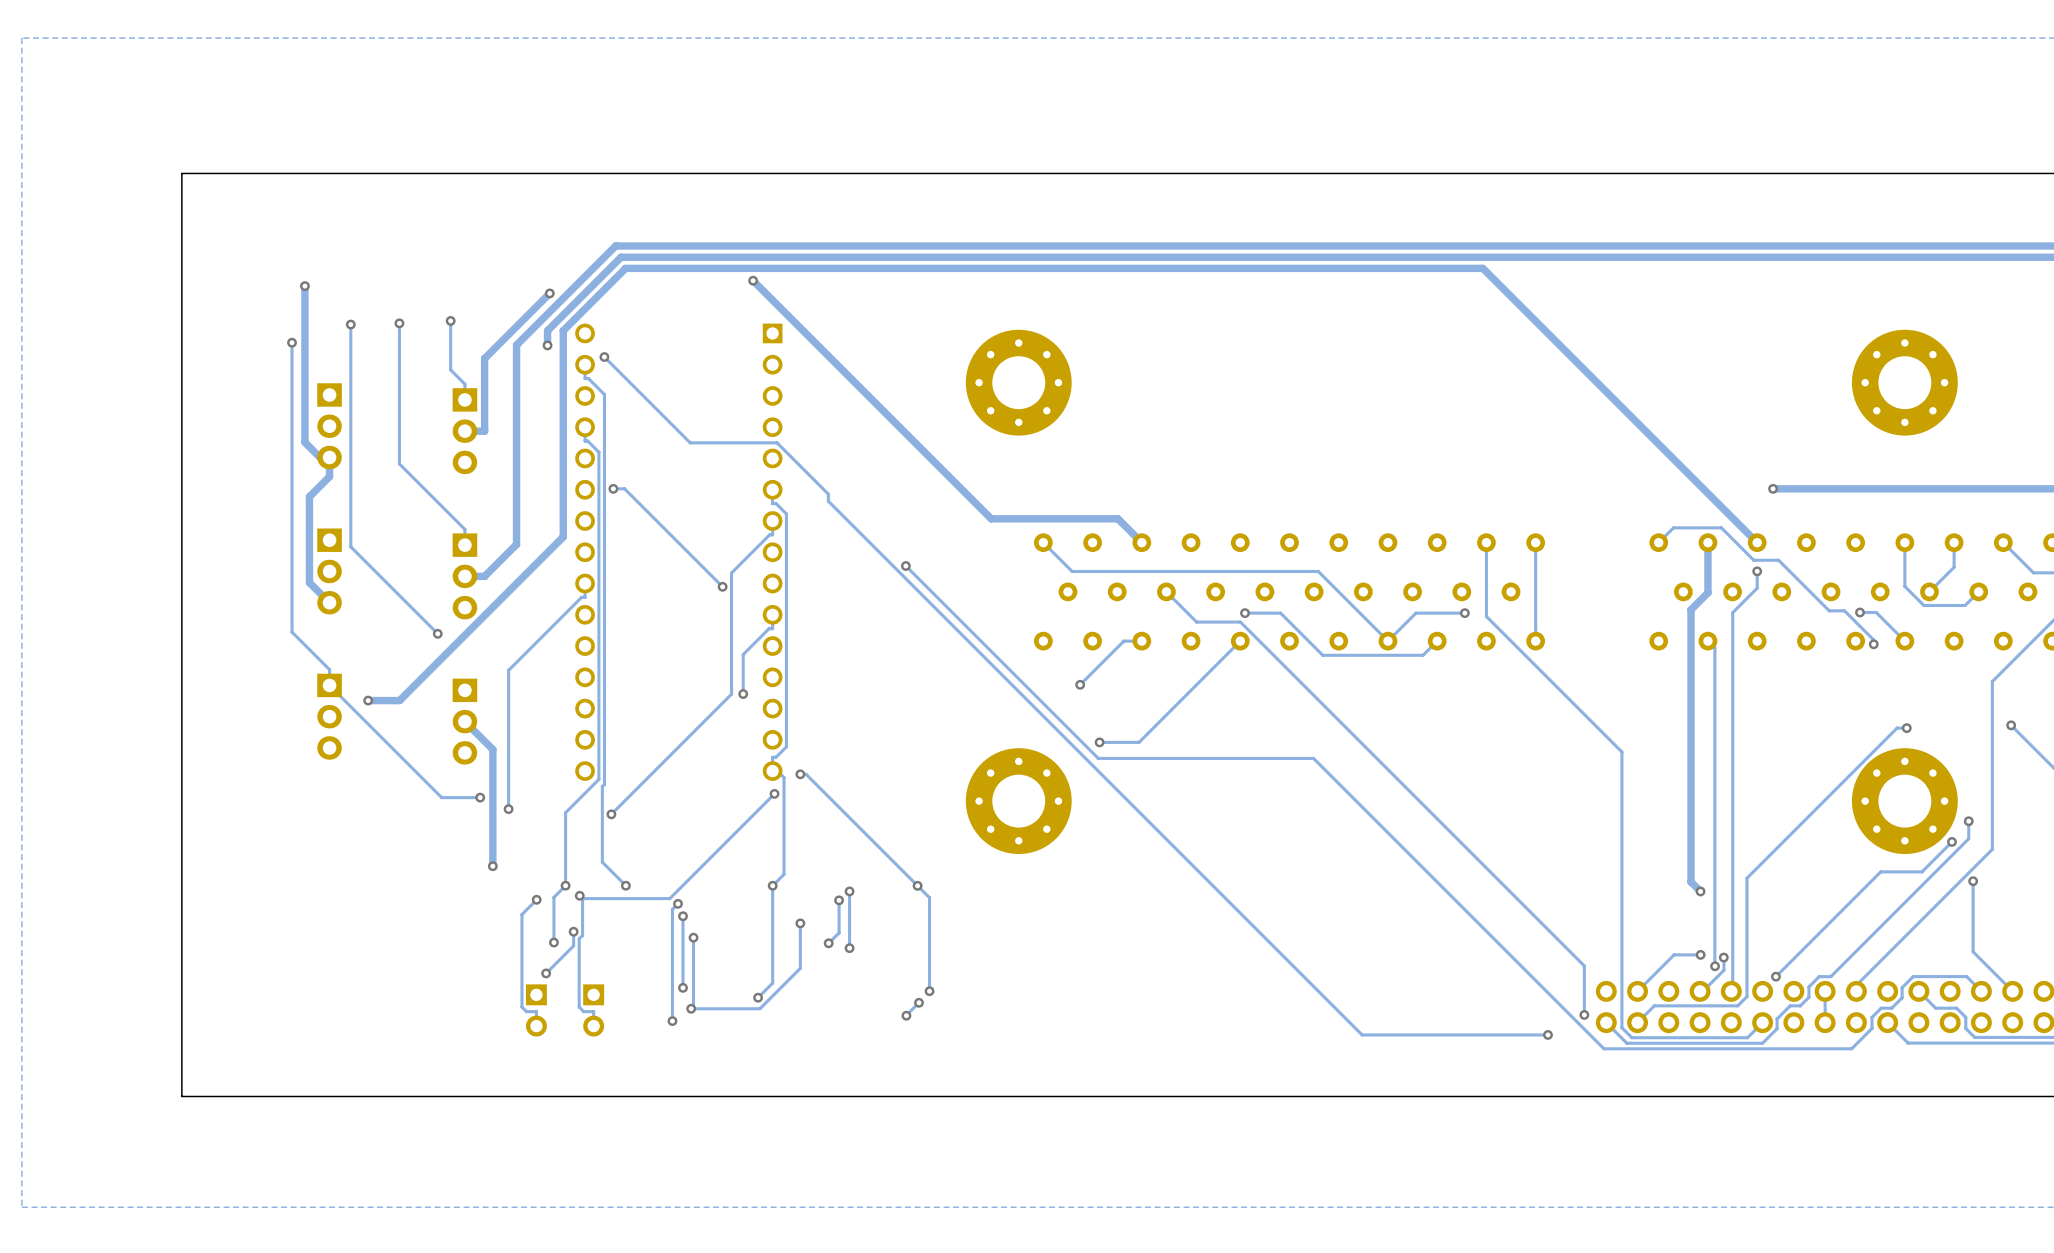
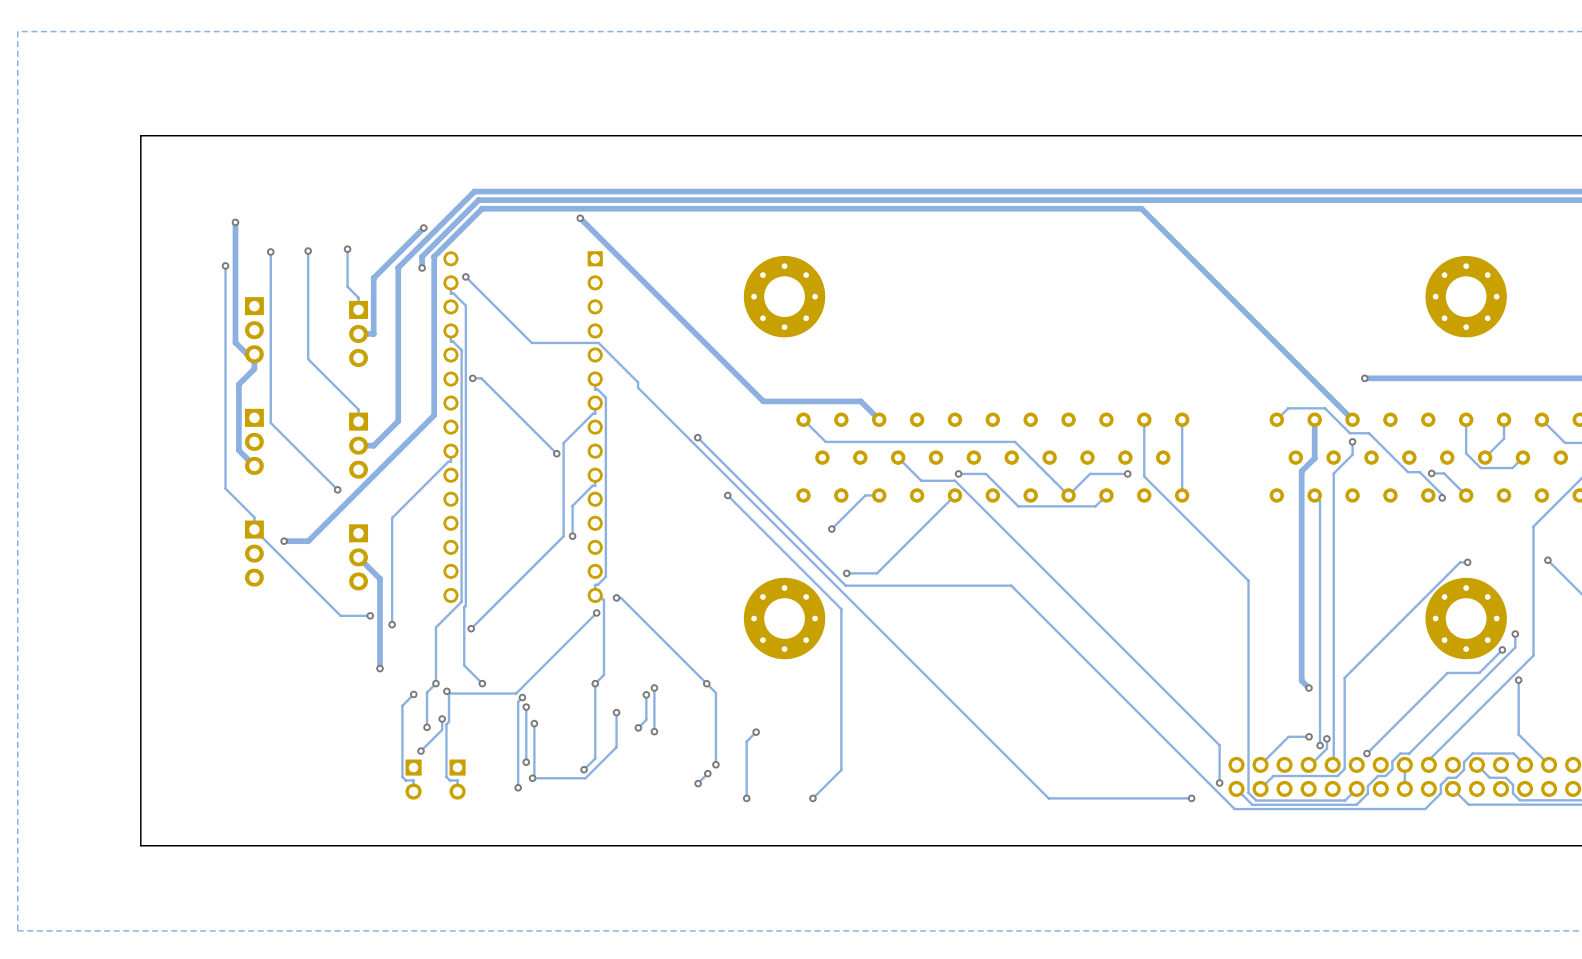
track: none -> (727, 495) (841, 609) (841, 770) (812, 798)
via: none -> (727, 495)
track: none -> (756, 732) (746, 741) (746, 798)
via: none -> (756, 732)
via: none -> (746, 798)
via: none -> (812, 798)

